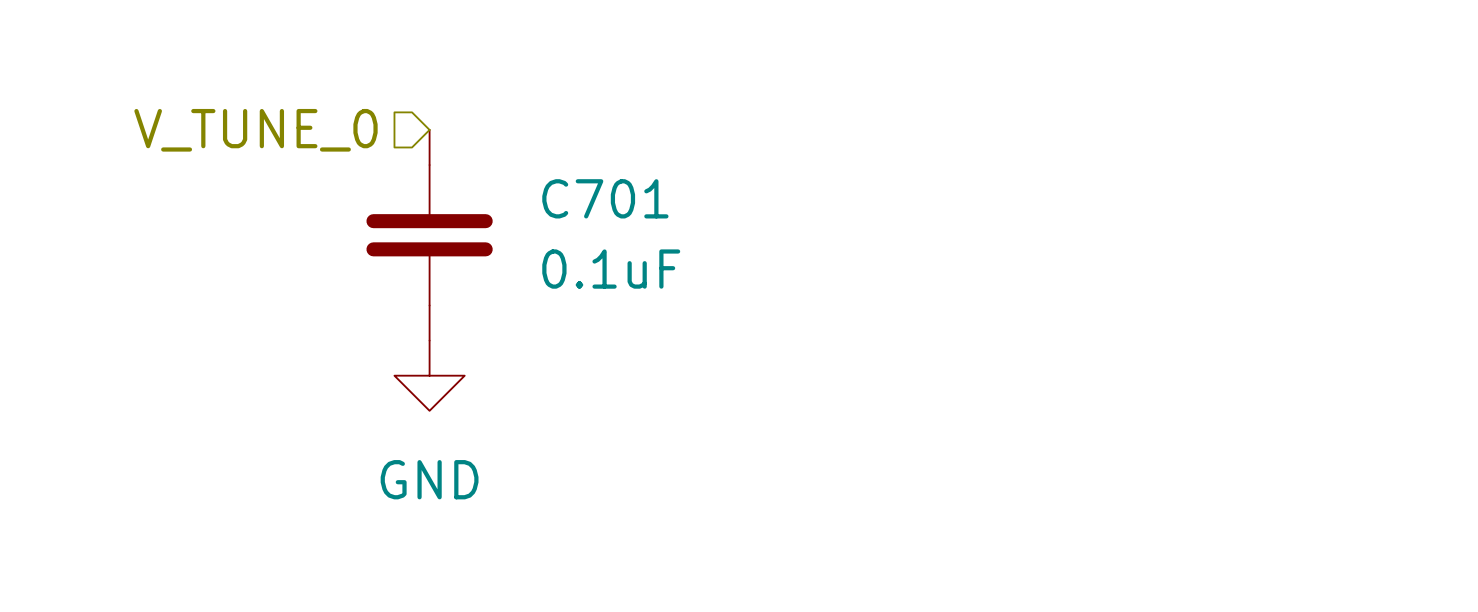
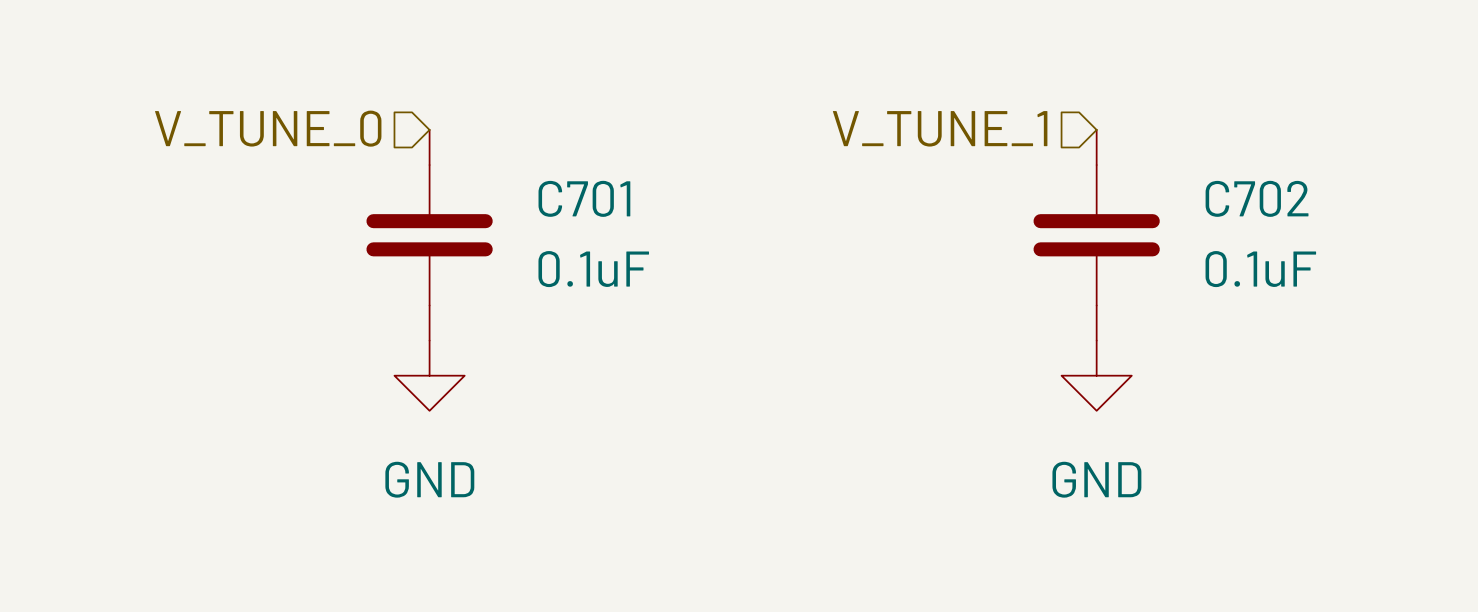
hierarchical label: none -> V_TUNE_1 (940, 128)
C702: none -> 0.1uF (1096, 235)
power symbol: none -> GND (1096, 375)

